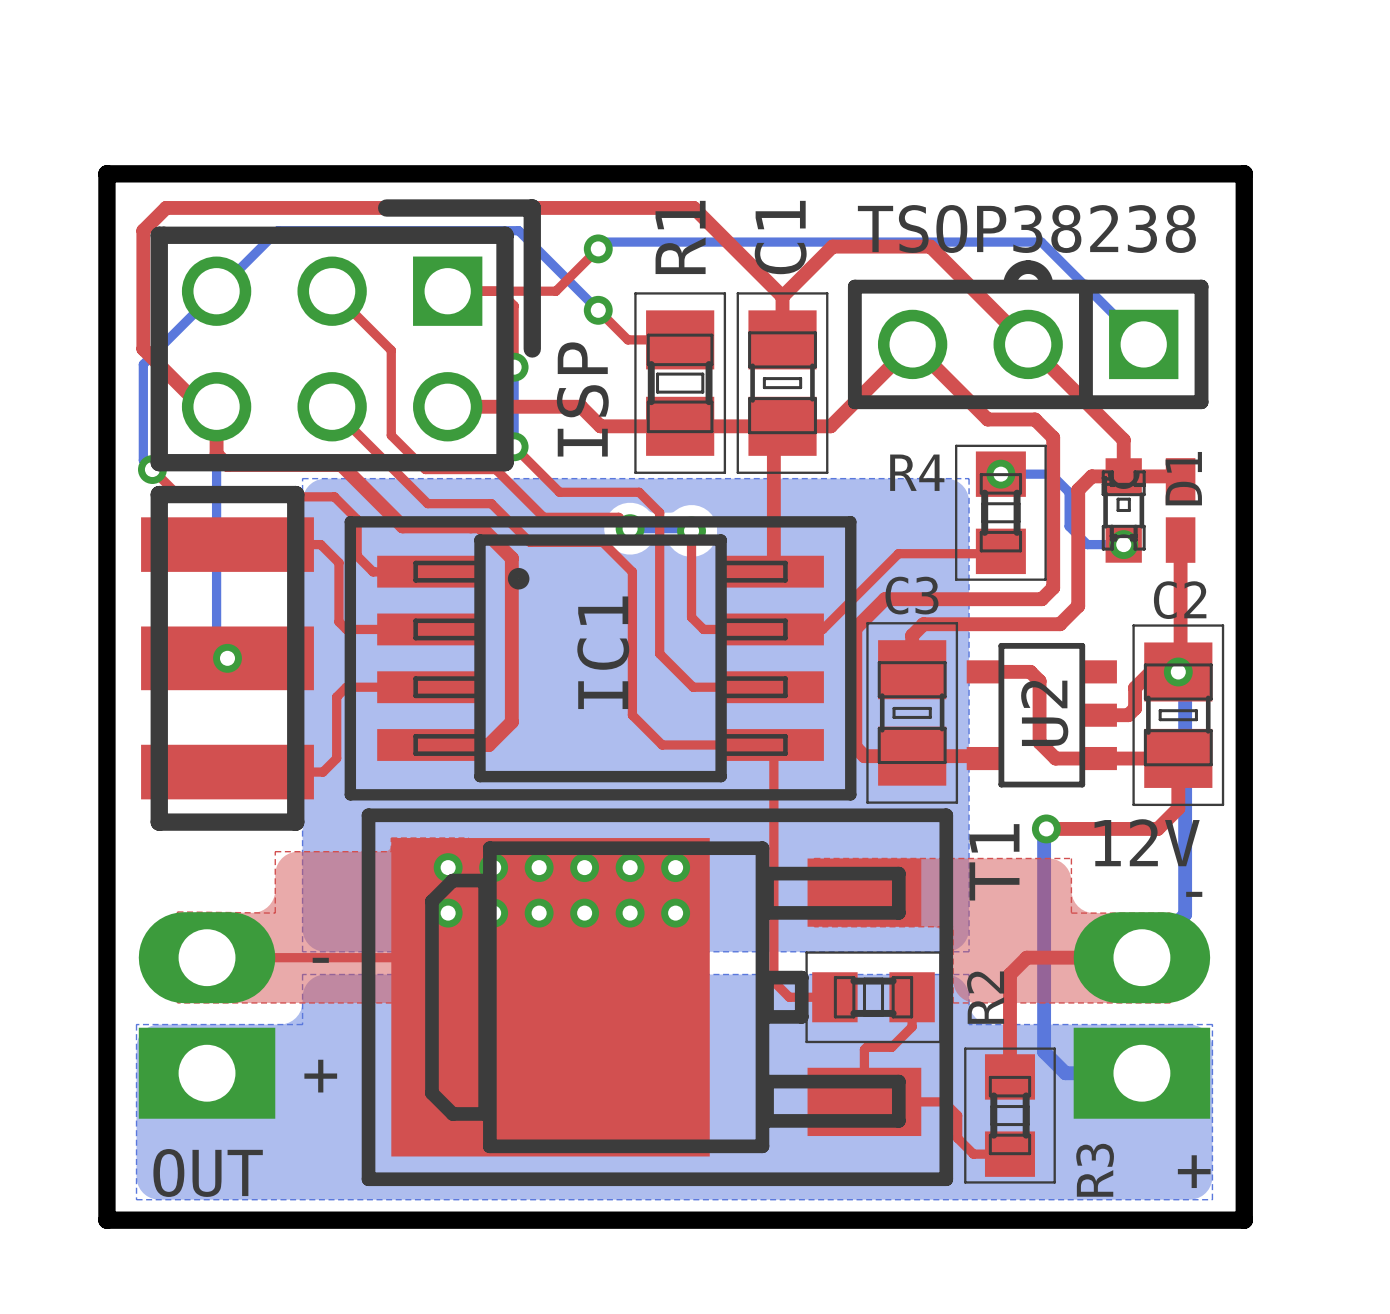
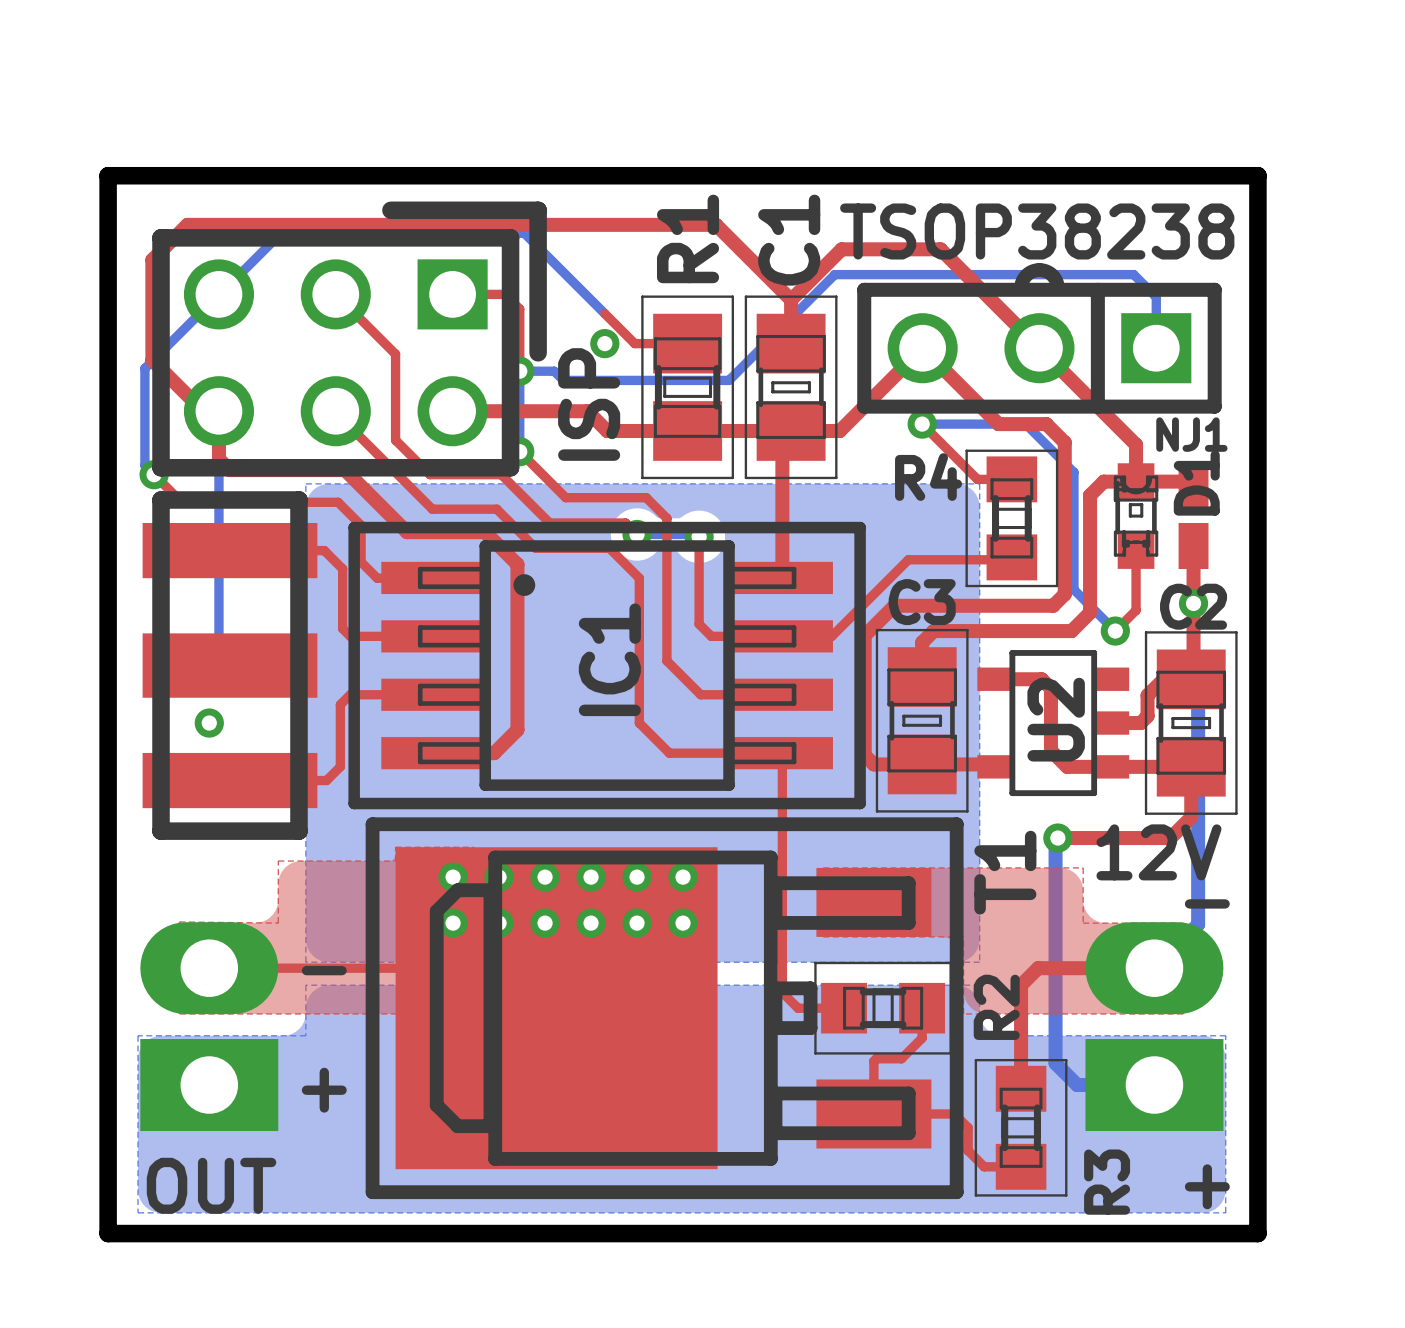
top track: (708, 222) (693, 207) (166, 207) (143, 230) (143, 348) (150, 356) -> (716, 224) (187, 224) (152, 259) (152, 360)
top track: (598, 248) (555, 291) (499, 291) -> none
bottom track: (598, 248) (605, 242) (1041, 242) (1143, 344) -> (519, 371) (554, 371) (563, 380) (729, 380) (834, 274) (1133, 274) (1156, 297) (1156, 348)
via: (598, 248) -> none
via position: (598, 310) -> (604, 343)
top track: none -> (922, 424) (977, 479) (1011, 479)
bottom track: none -> (922, 424) (1025, 424) (1073, 472) (1073, 589) (1115, 631)
via: none -> (922, 424)
NJ1 name: none -> NJ1 (1191, 434)
bottom track: (1000, 474) (1051, 474) (1069, 492) (1069, 526) (1087, 544) (1123, 544) -> none
via: (1000, 474) -> none
top track: none -> (1136, 550) (1136, 610) (1115, 631)
via: (1123, 544) -> none
via: none -> (1193, 603)
via: none -> (1115, 631)
via position: (227, 658) -> (209, 723)
via: (1178, 671) -> none

